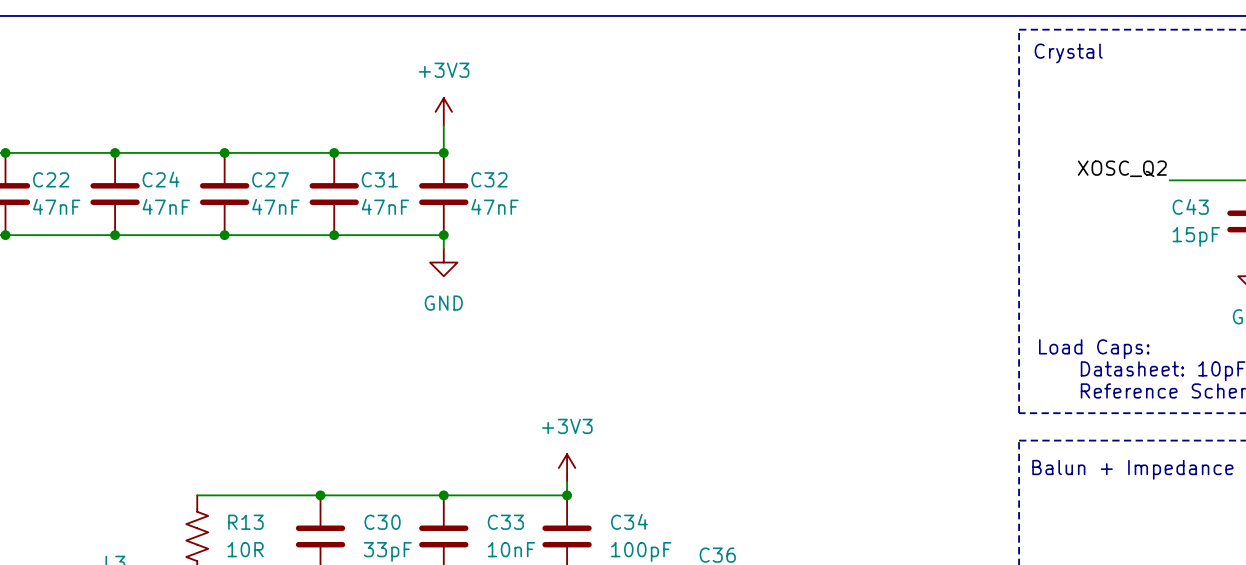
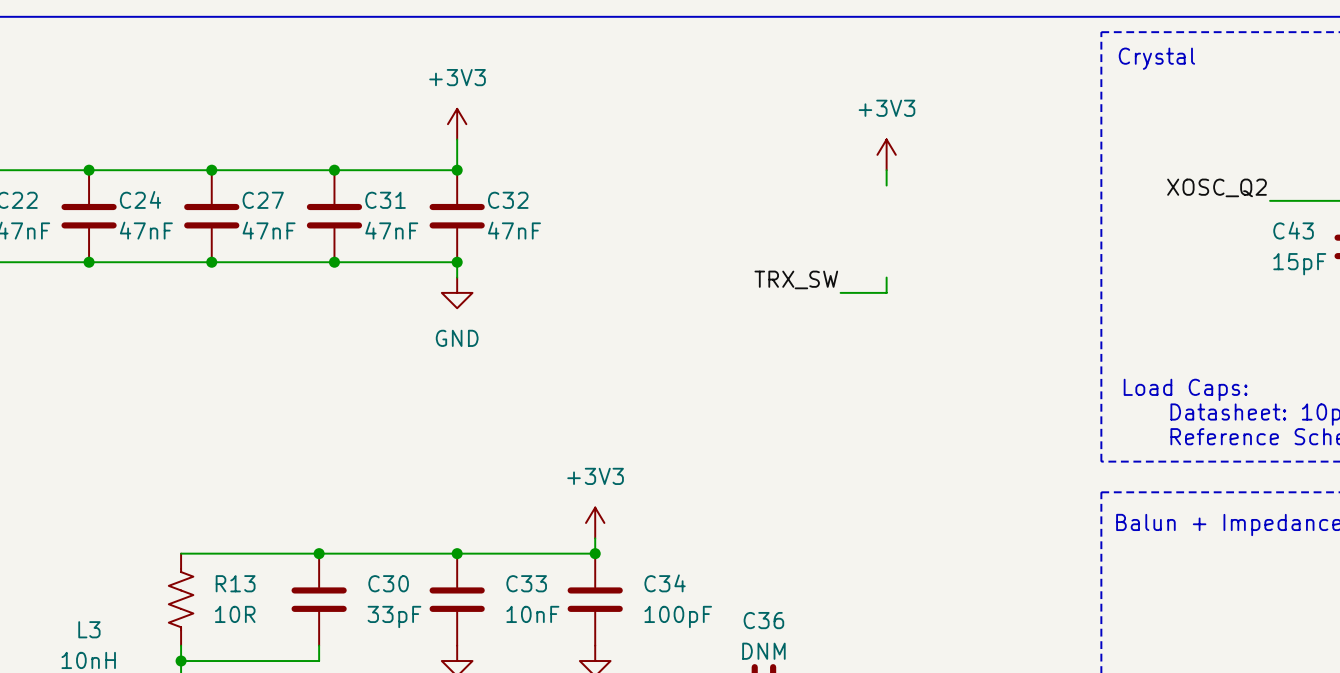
power symbol: none -> +3V3 (886, 154)
wire: none -> (886, 170) (886, 185)
wire: none -> (886, 277) (886, 292) (840, 292)
label: none -> TRX_SW (796, 279)

